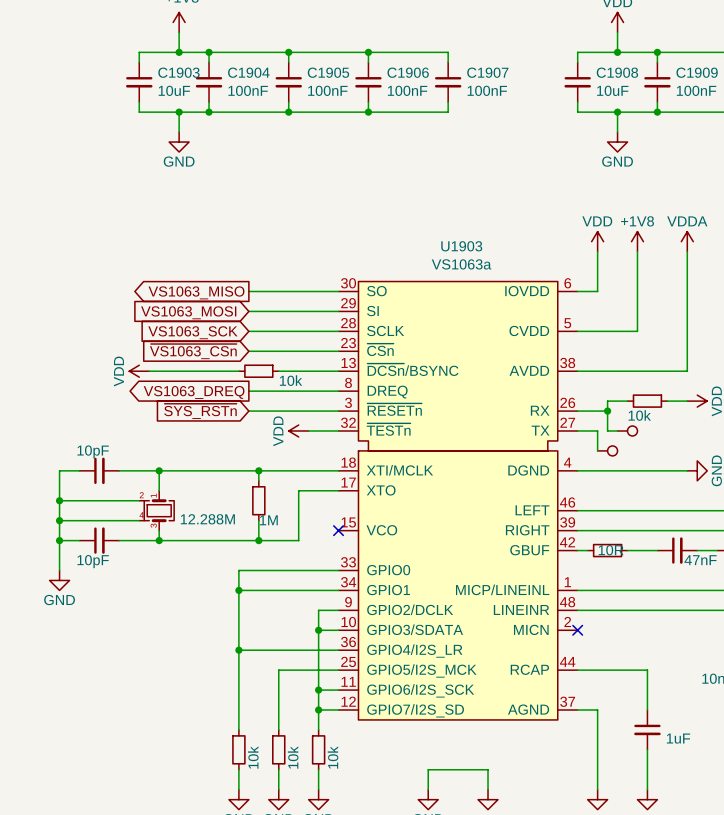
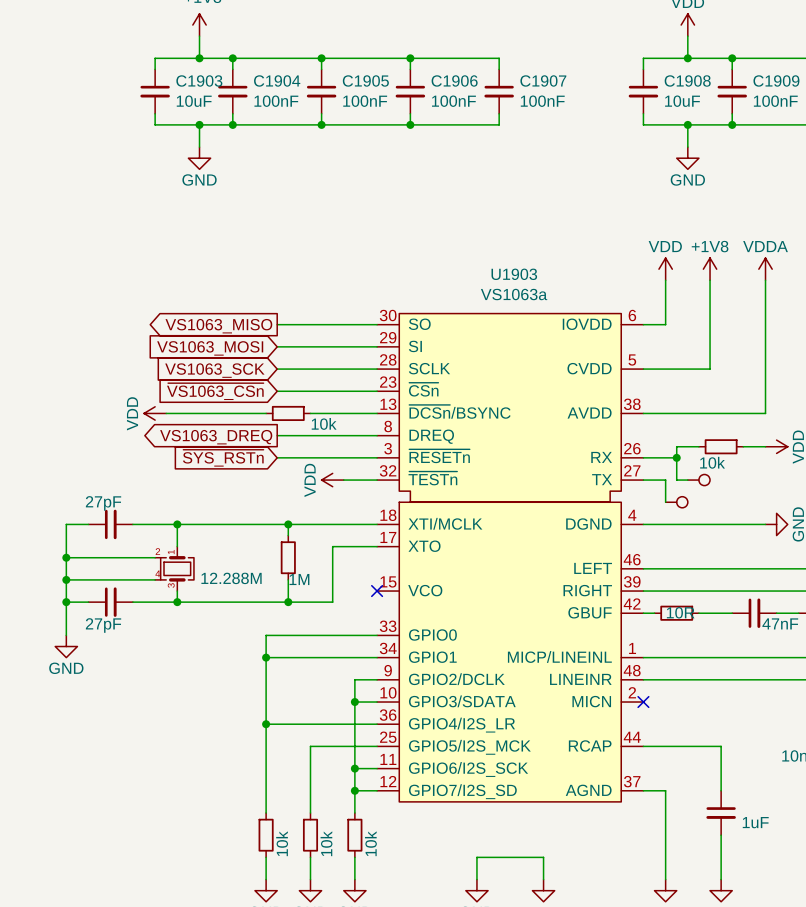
part value: 10pF (93, 451) -> 27pF (103, 503)
part value: 10pF (93, 561) -> 27pF (103, 625)

